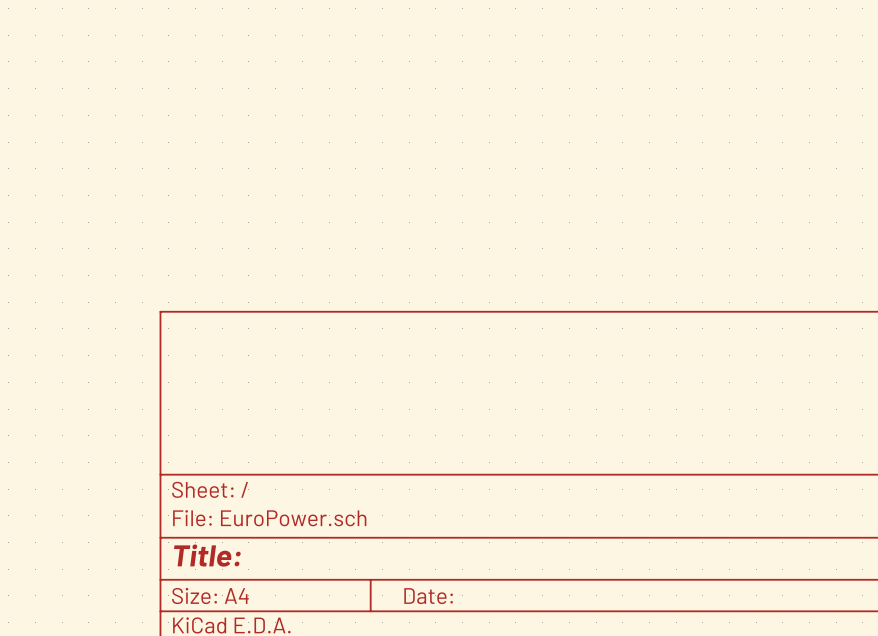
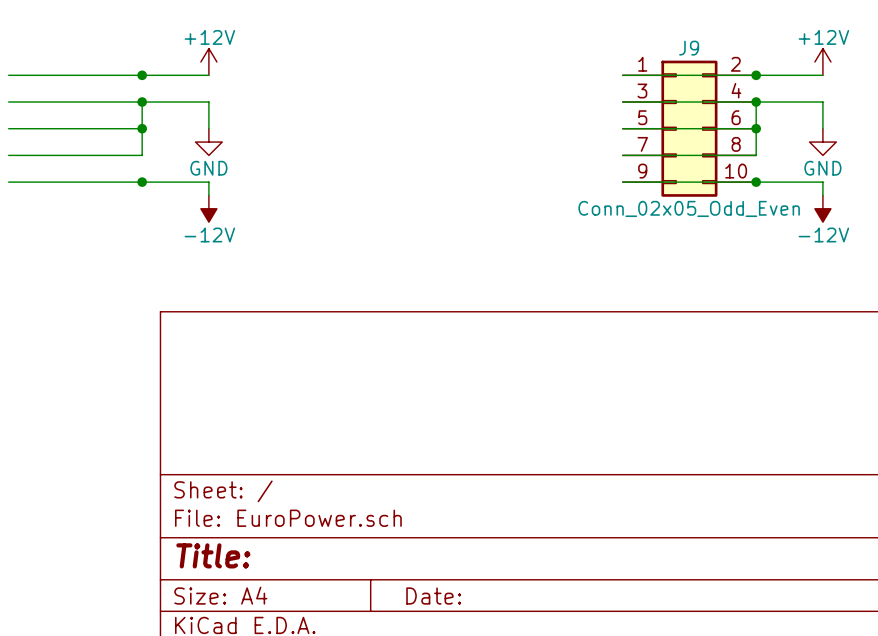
power symbol: none -> +12V (208, 61)
power symbol: none -> +12V (822, 61)
wire: none -> (8, 75) (208, 75)
junction: none -> (142, 75)
wire: none -> (622, 75) (822, 75)
junction: none -> (756, 75)
wire: none -> (8, 102) (208, 102) (208, 128)
wire: none -> (142, 102) (142, 155) (8, 155)
junction: none -> (142, 102)
wire: none -> (622, 102) (822, 102) (822, 128)
wire: none -> (756, 102) (756, 155) (622, 155)
junction: none -> (756, 102)
wire: none -> (8, 128) (142, 128)
junction: none -> (142, 128)
wire: none -> (622, 128) (756, 128)
J9: none -> Conn_02x05_Odd_Even (689, 128)
junction: none -> (756, 128)
power symbol: none -> GND (208, 142)
power symbol: none -> GND (822, 142)
wire: none -> (8, 182) (208, 182) (208, 195)
junction: none -> (142, 182)
wire: none -> (622, 182) (822, 182) (822, 195)
junction: none -> (756, 182)
power symbol: none -> -12V (208, 208)
power symbol: none -> -12V (822, 208)

